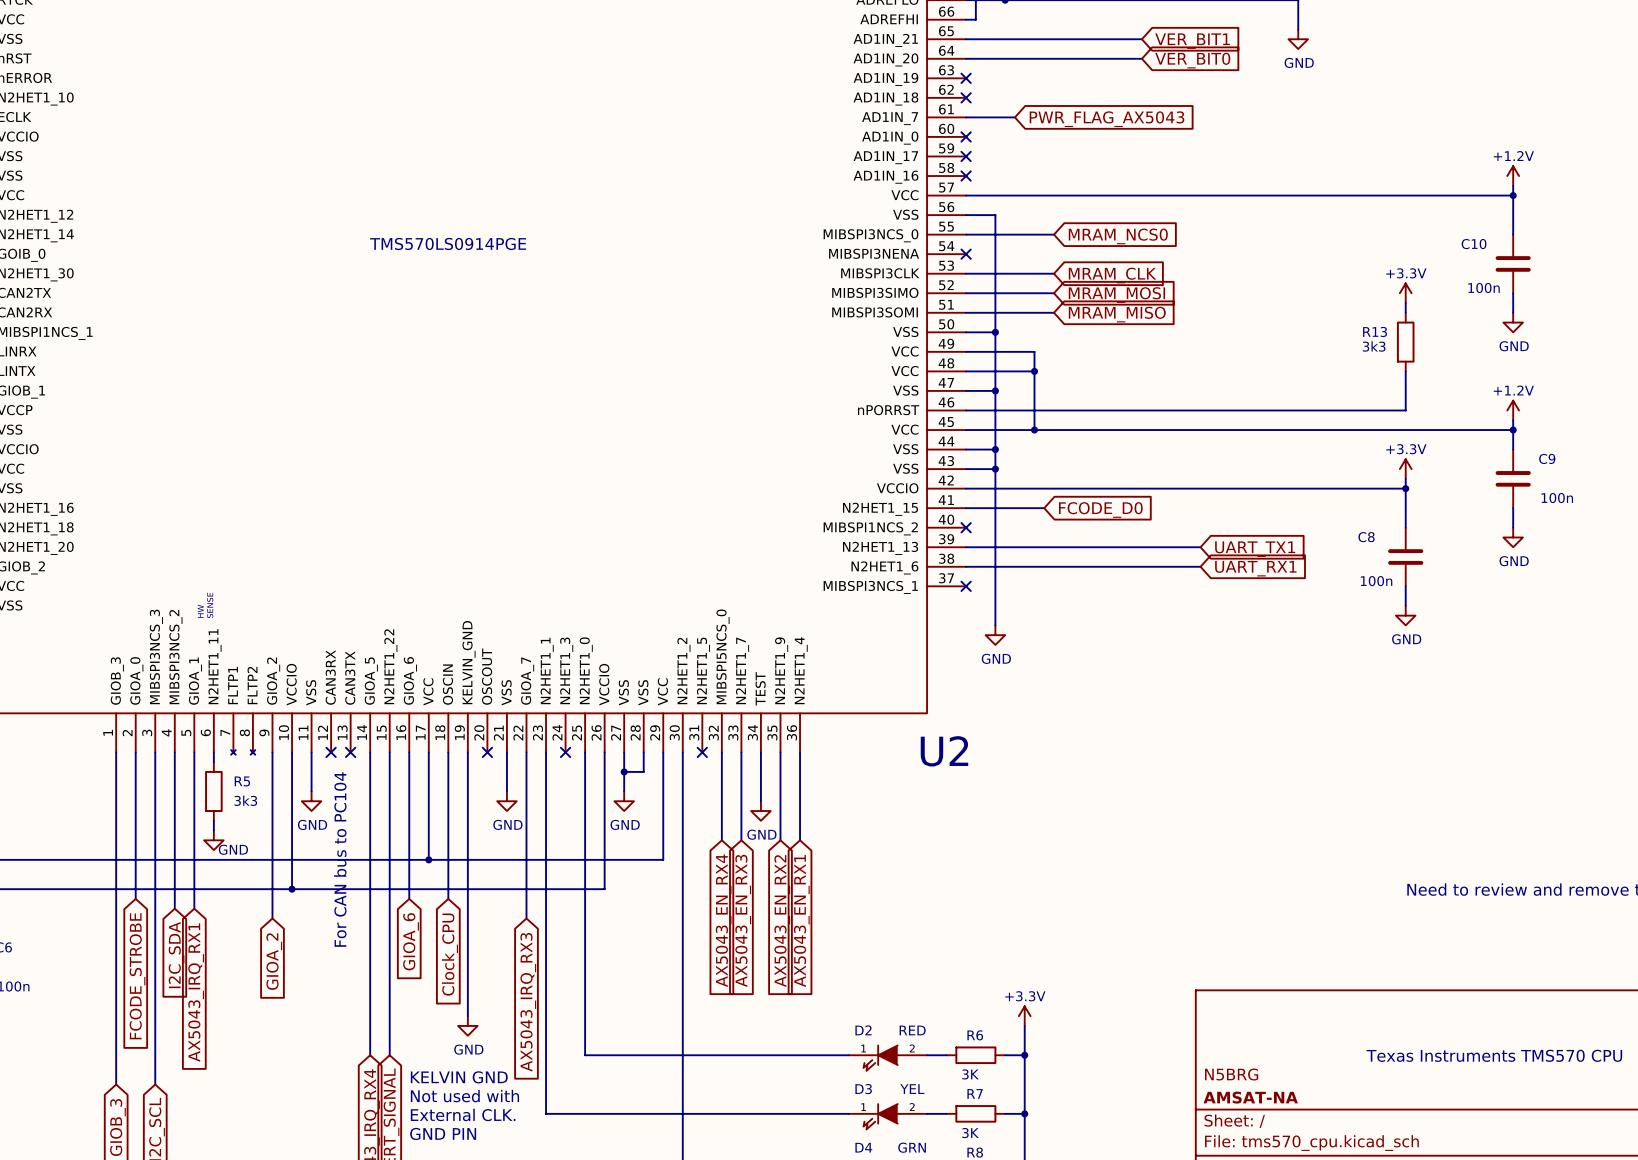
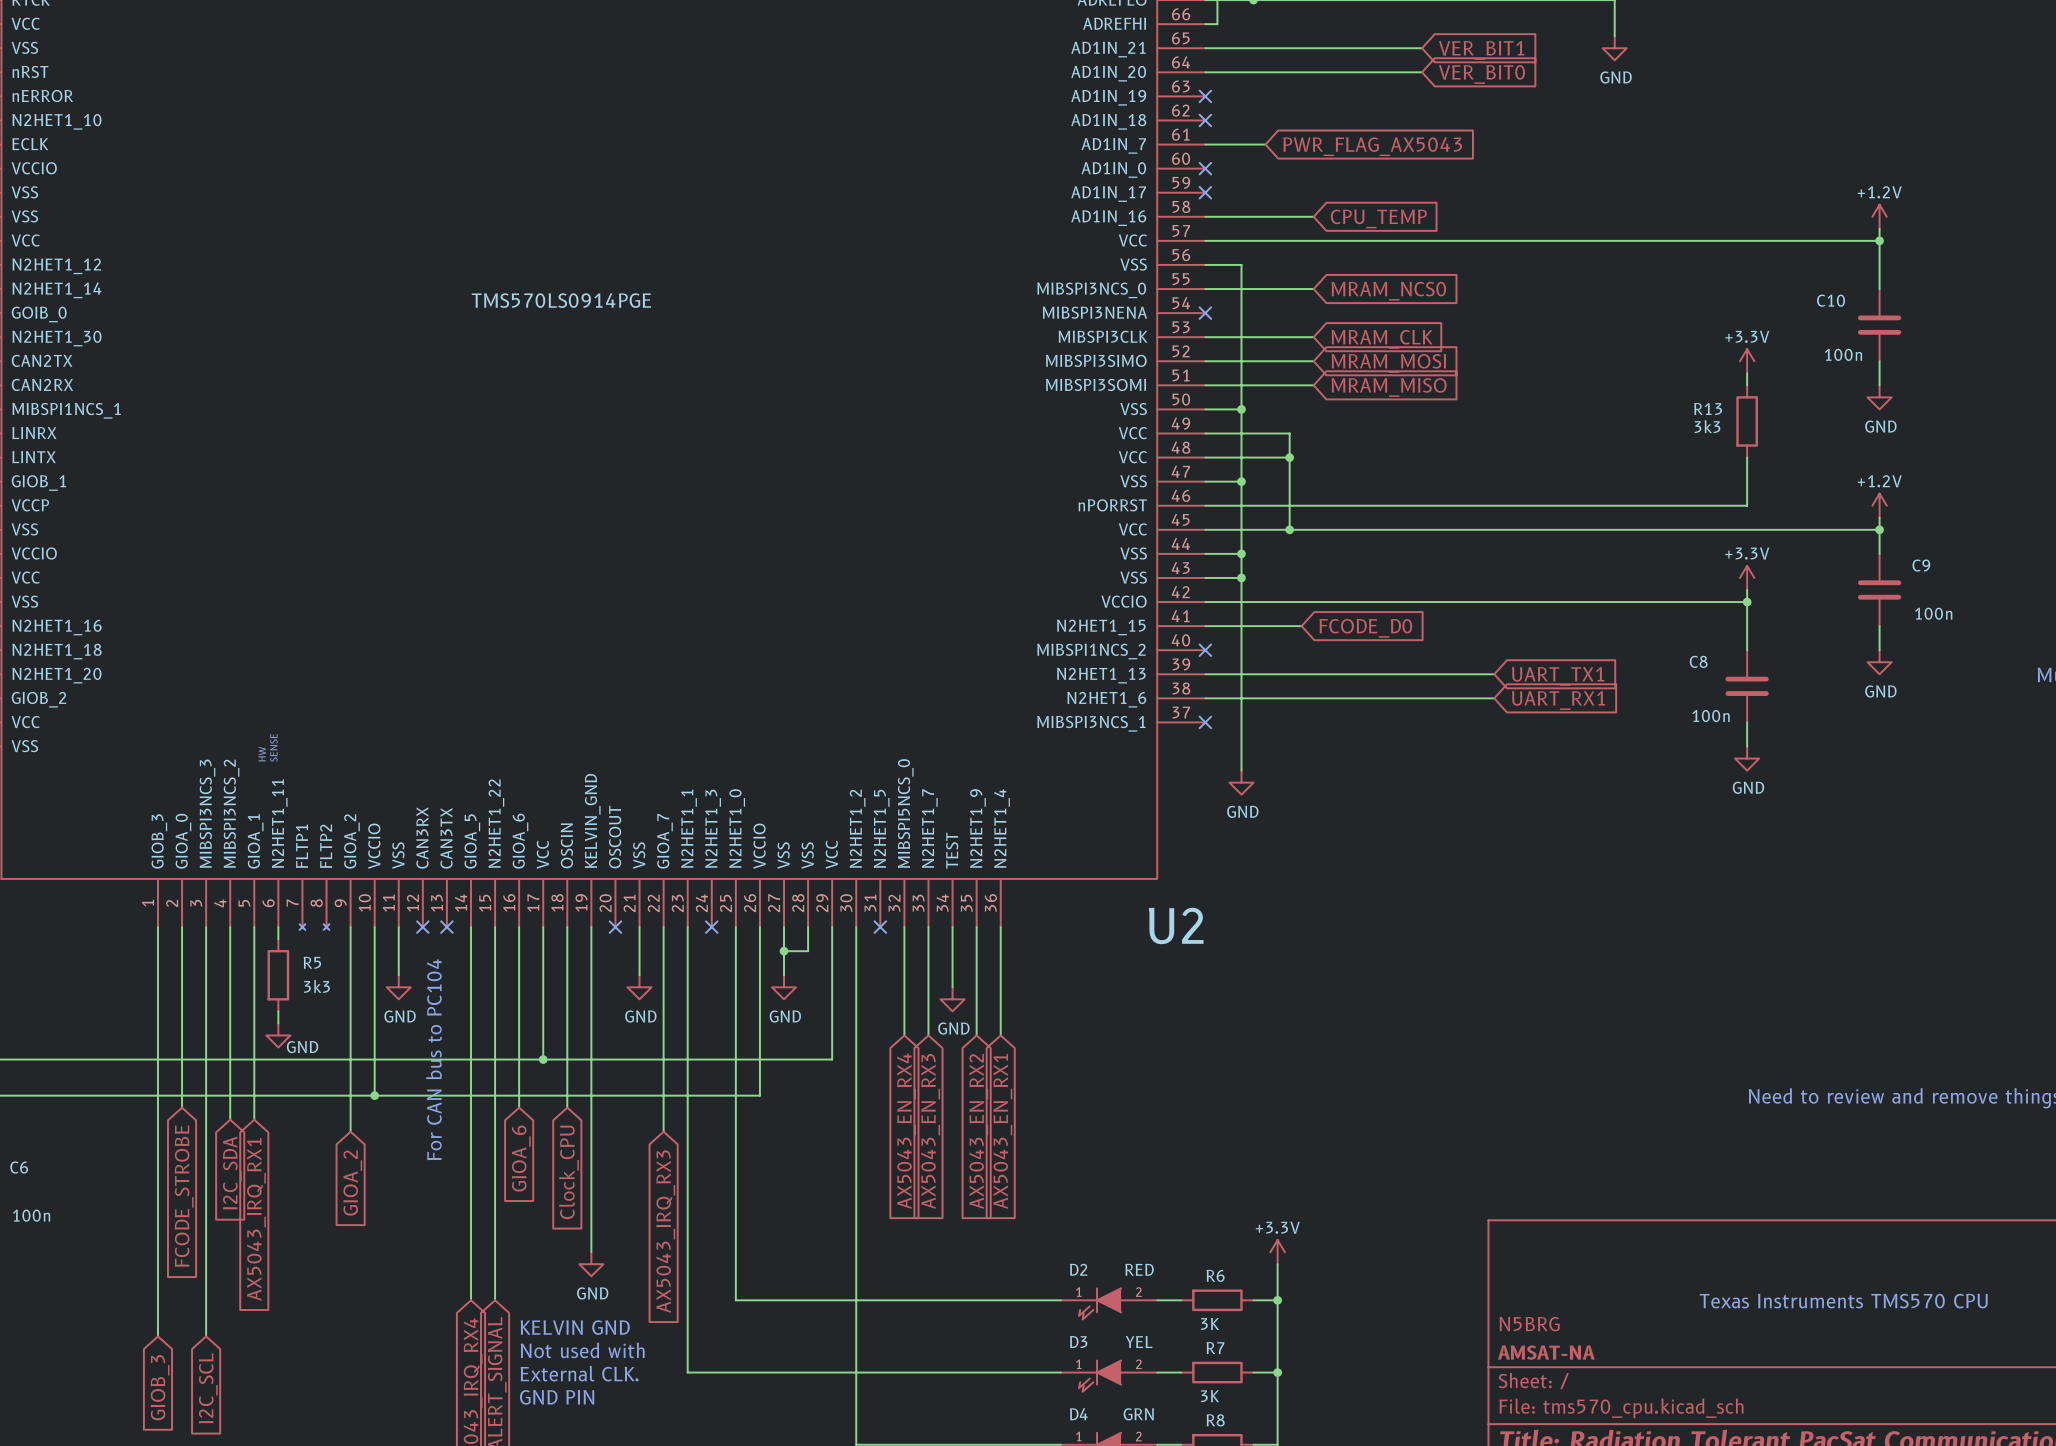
wire: none -> (1205, 216) (1313, 216)
no-connect mark: (966, 176) -> none
global label: none -> CPU_TEMP (1378, 218)

